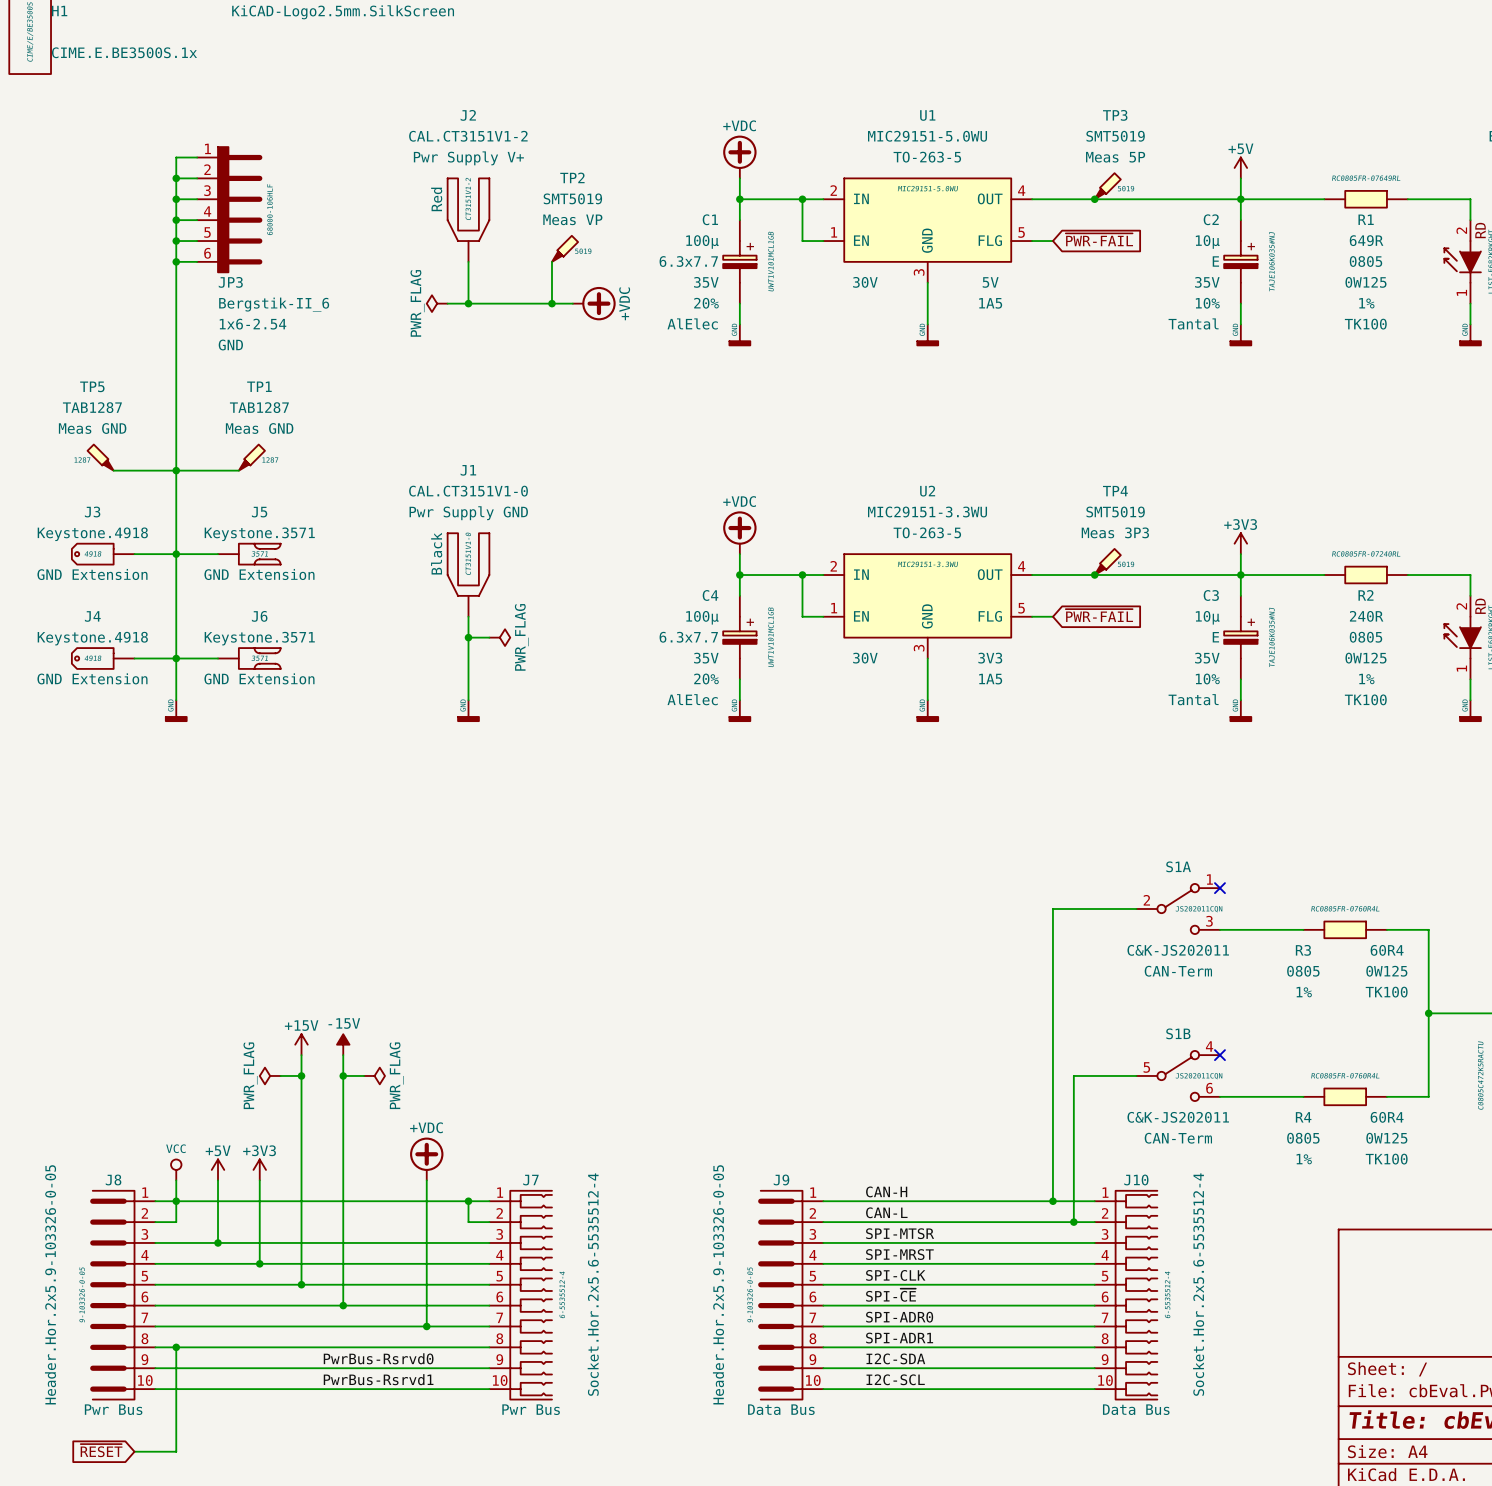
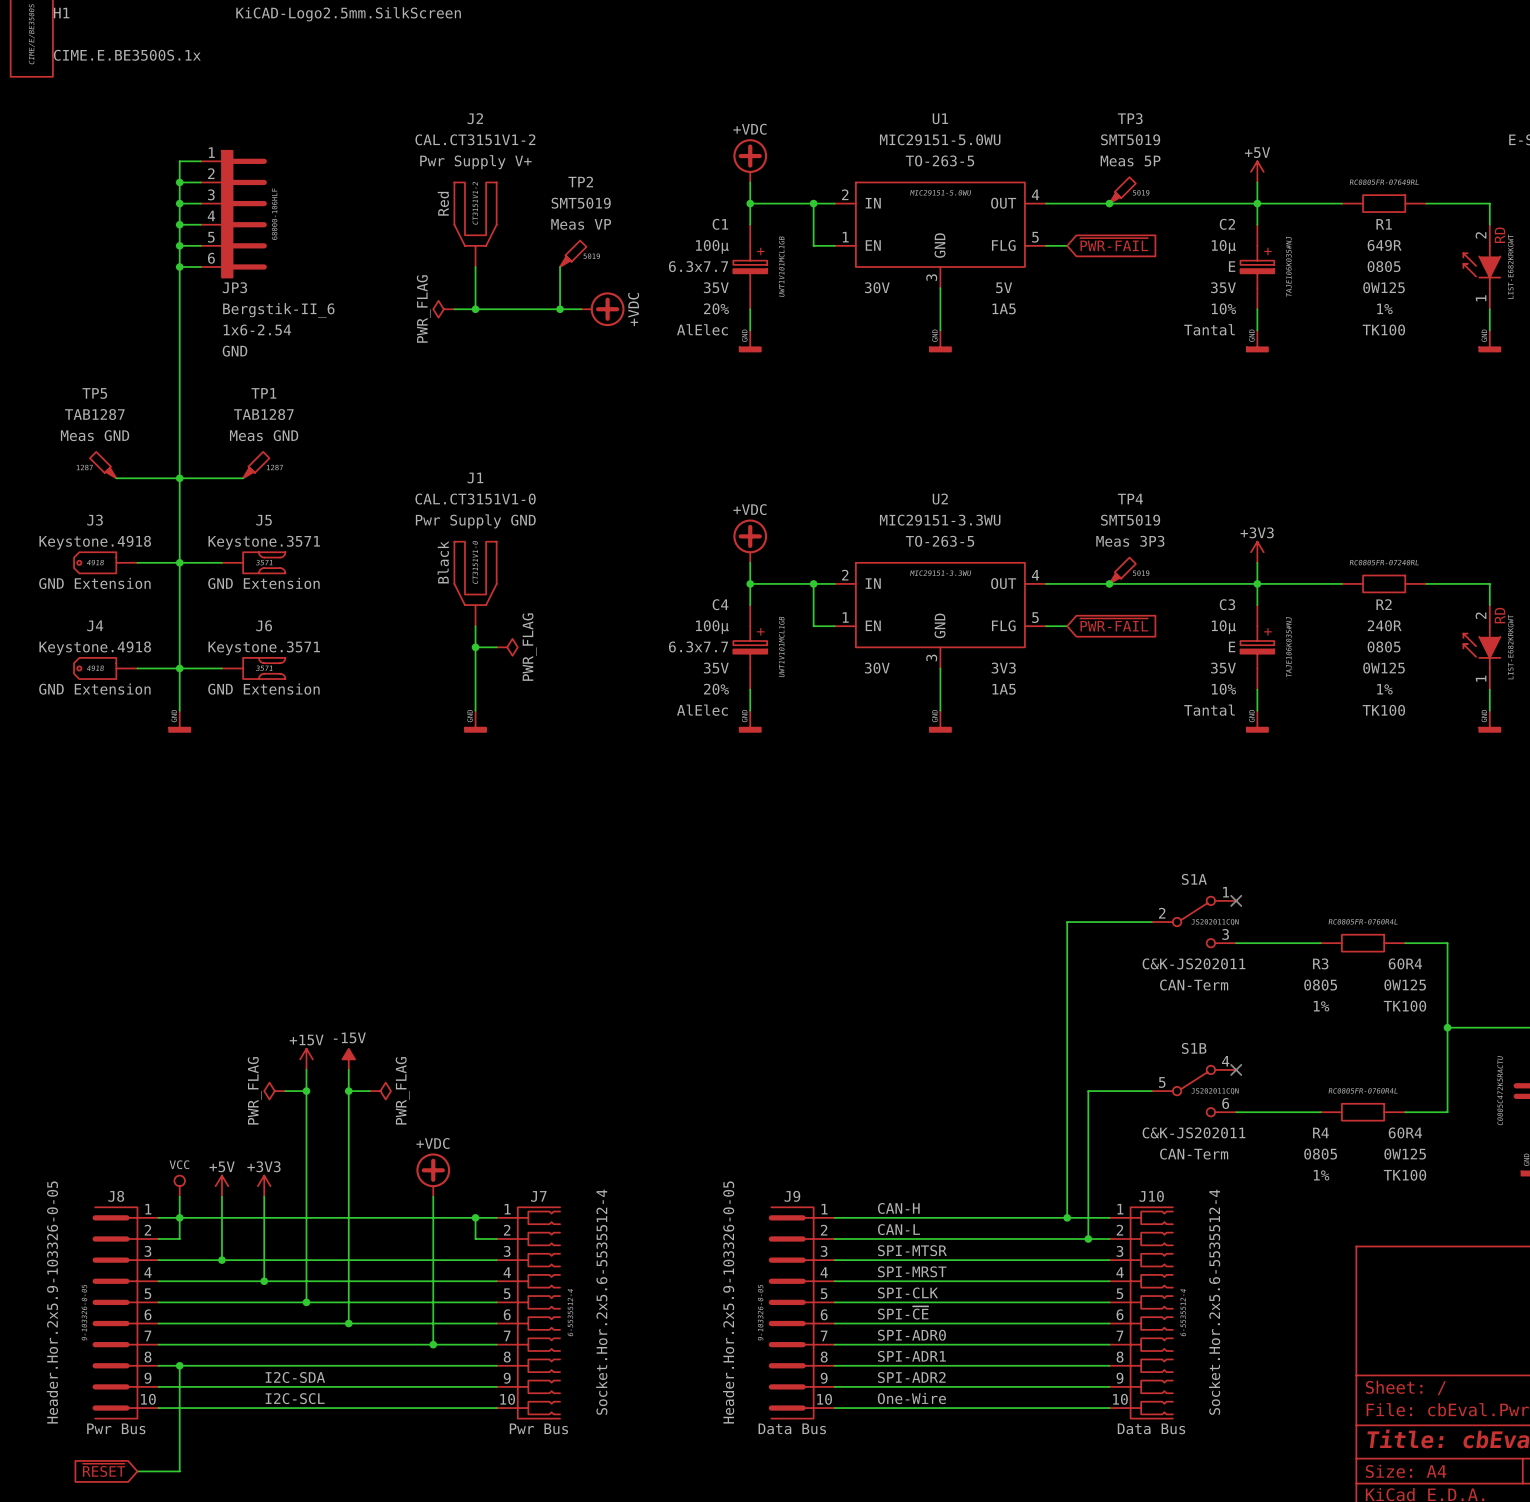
label: none -> I2C-SDA (295, 1377)
label: PwrBus-Rsrvd0 (378, 1358) -> none
label: I2C-SDA (895, 1358) -> SPI-ADR2 (911, 1377)
label: none -> I2C-SCL (295, 1398)
label: PwrBus-Rsrvd1 (378, 1379) -> none
label: I2C-SCL (895, 1379) -> One-Wire (911, 1398)

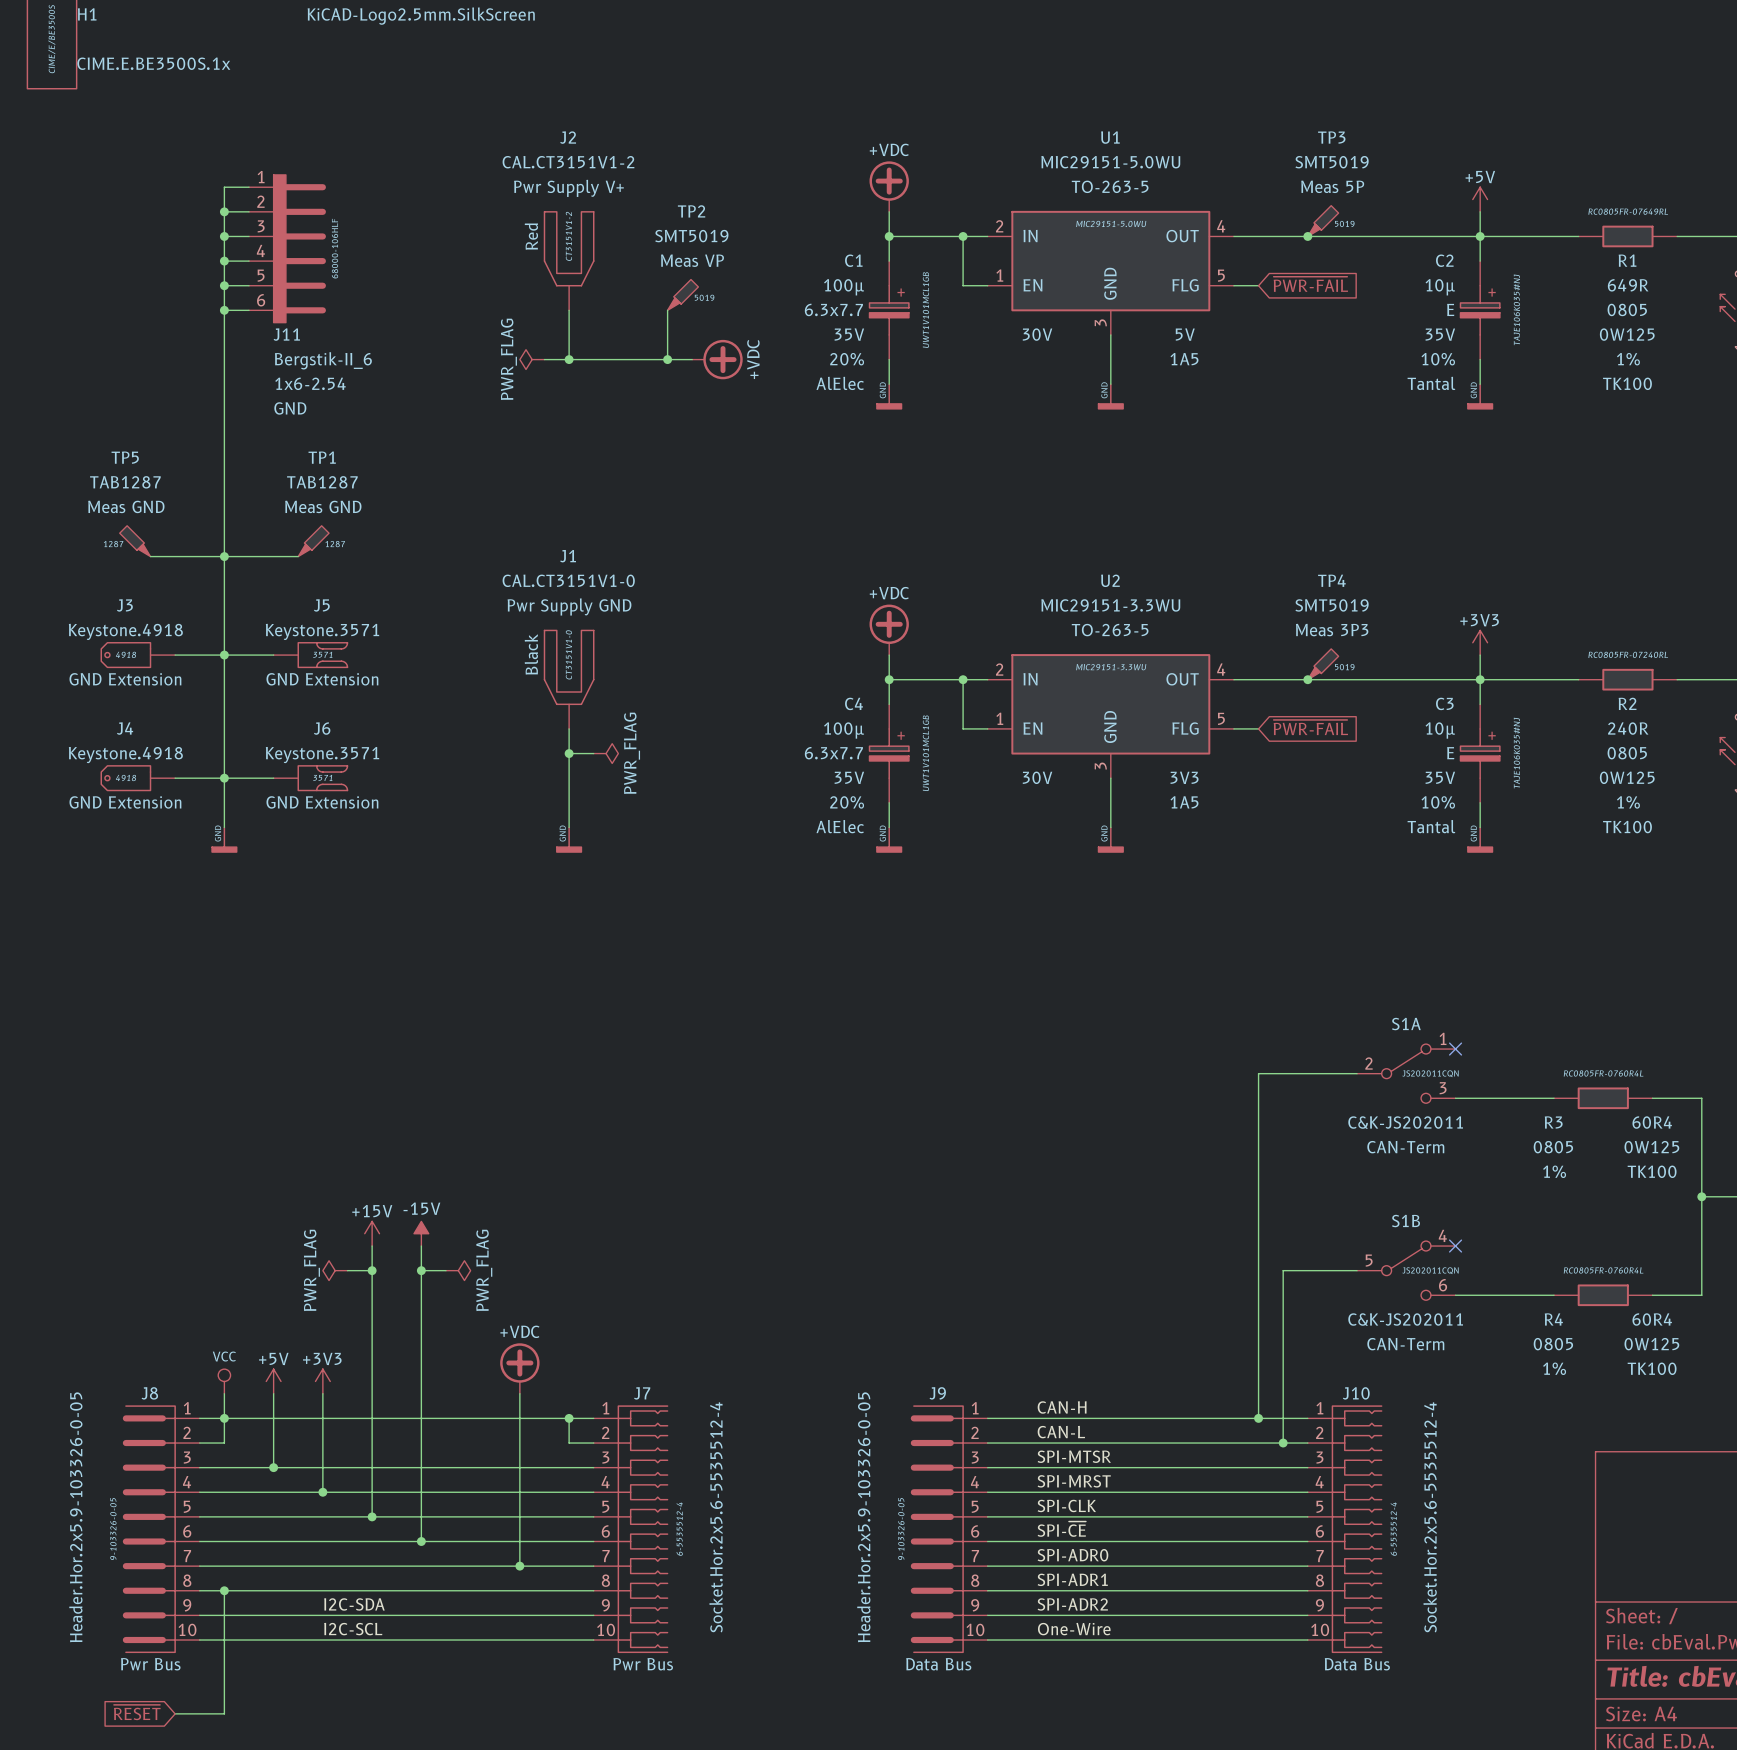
JP3 name: JP3 (234, 287) -> J11 (286, 334)

